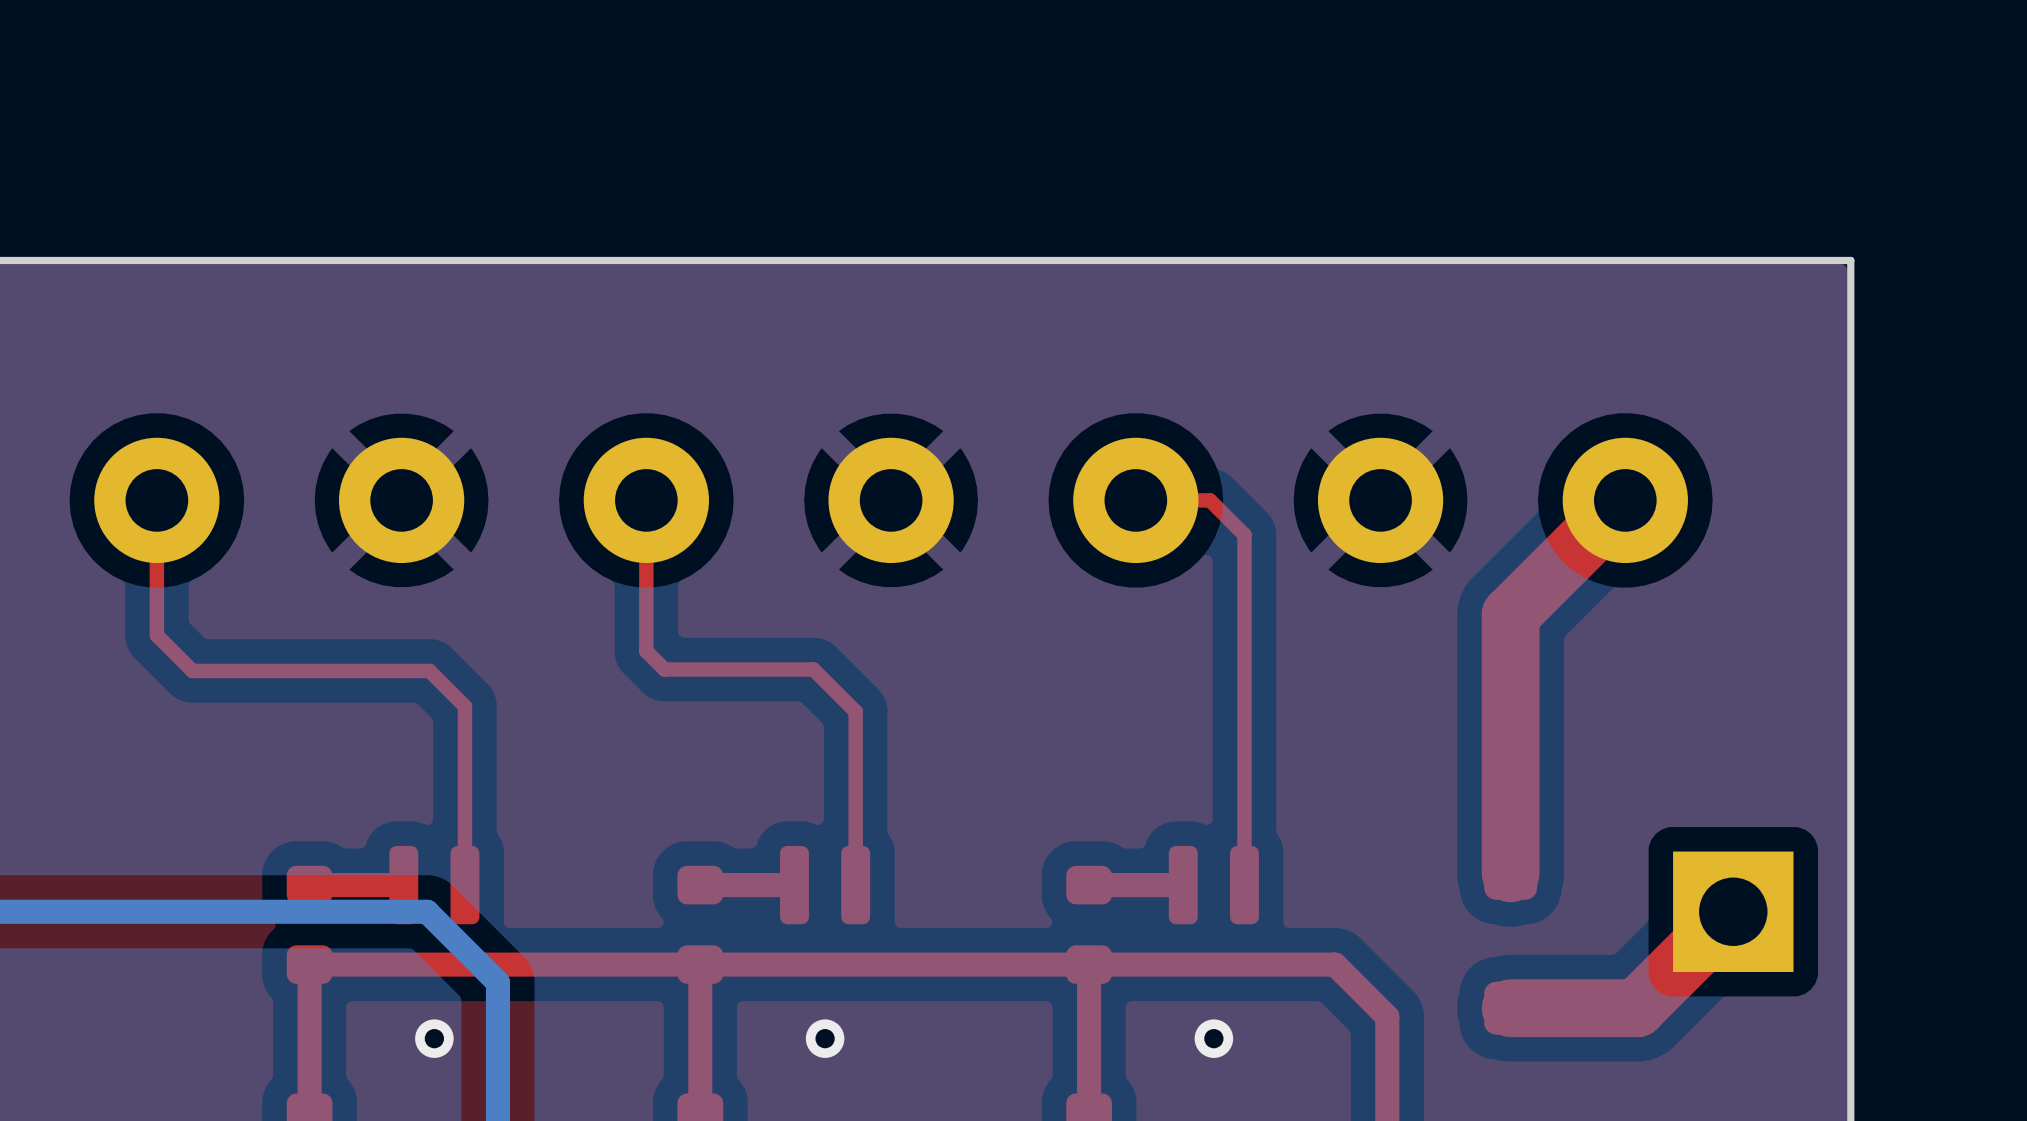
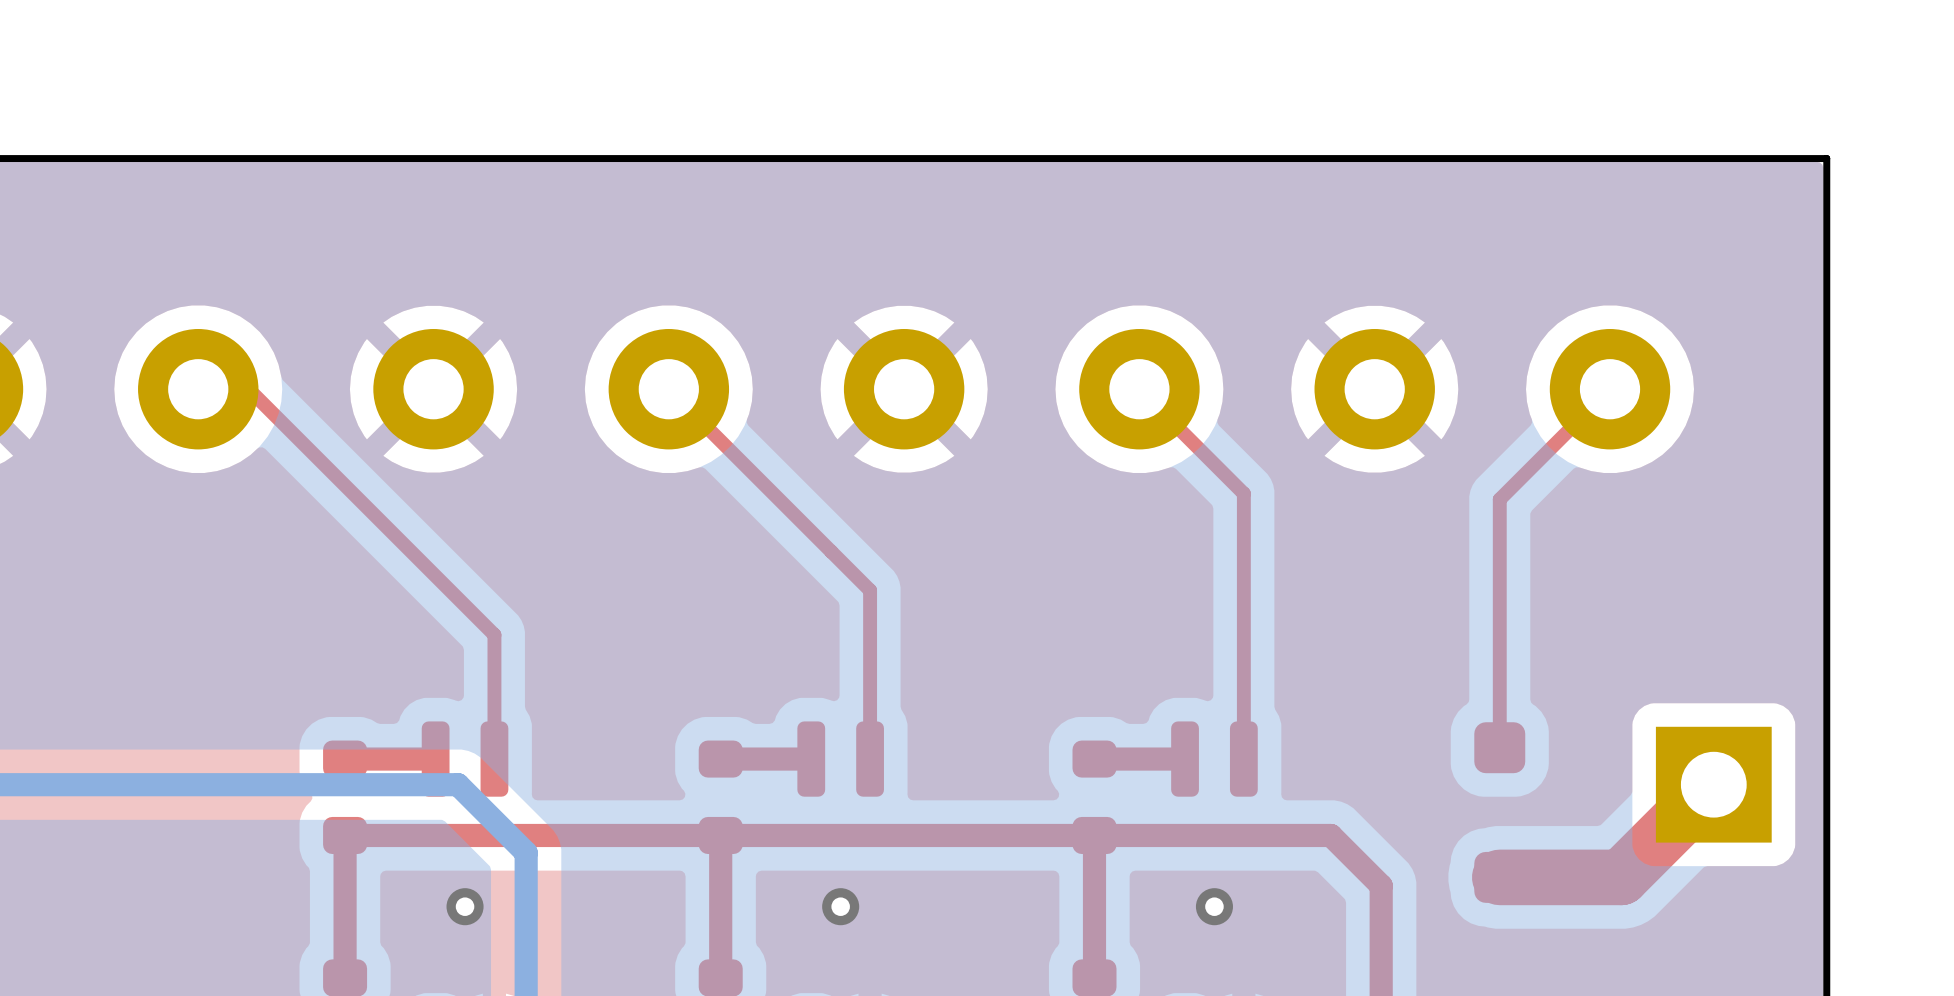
top track: (156, 500) (156, 635) (192, 670) (429, 670) (464, 706) (464, 755) -> (198, 389) (248, 389) (494, 634)
top track: (646, 500) (646, 651) (664, 669) (813, 669) (855, 711) -> (668, 389) (870, 592)
top track: (1135, 500) (1210, 500) (1244, 534) (1244, 609) -> (1139, 389) (1243, 493)
top track width: thick (1625, 500) (1510, 615) (1510, 873) -> thin (1610, 389) (1499, 499) (1499, 747)

